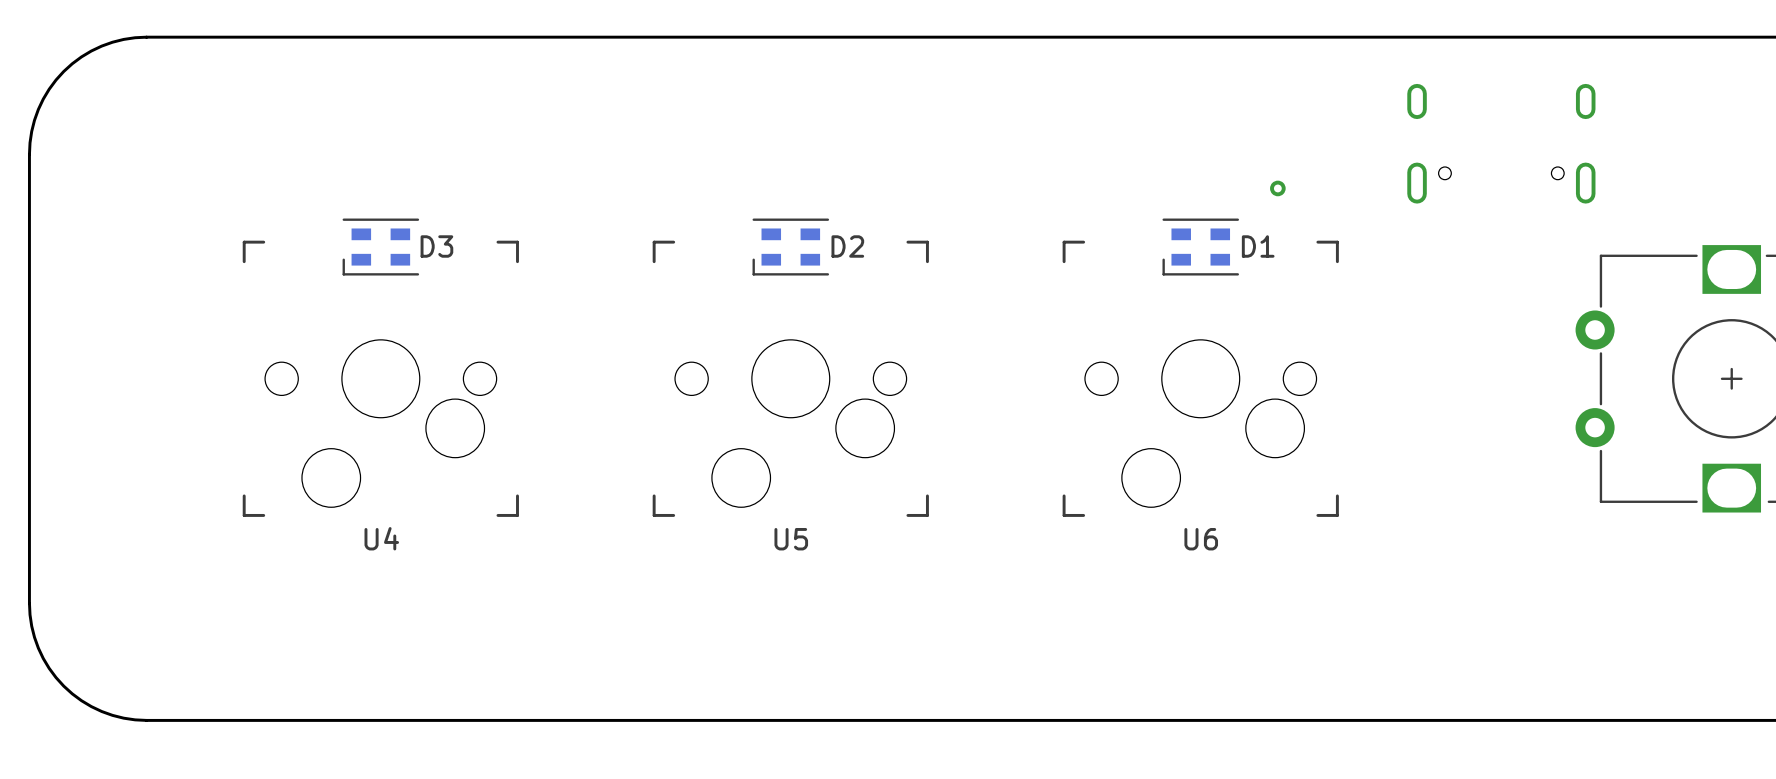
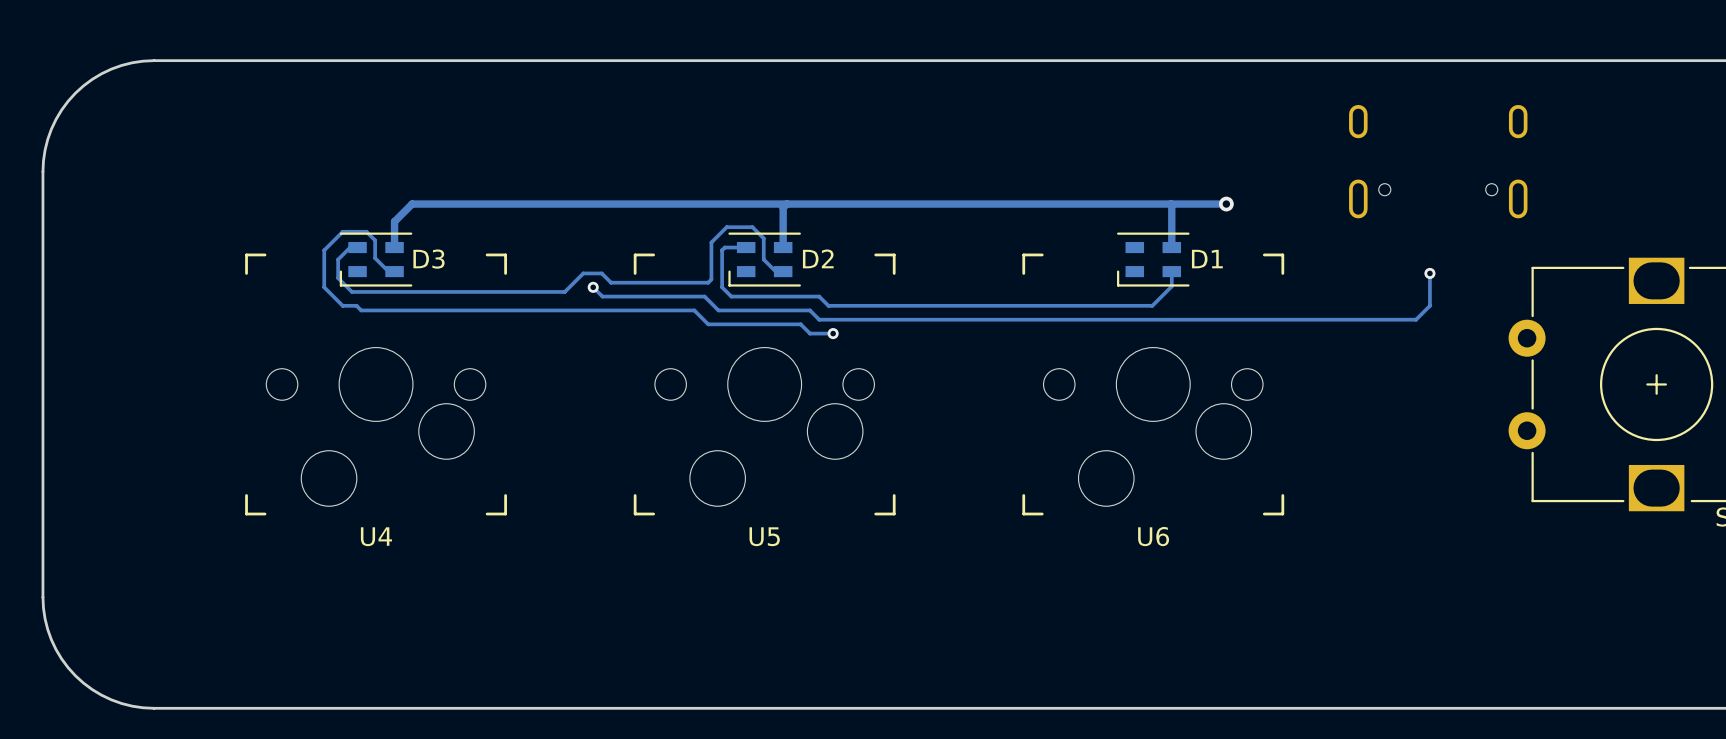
track: none -> (786, 204) (783, 207) (783, 247)
track: none -> (1170, 204) (1171, 247)
track: none -> (1226, 204) (412, 204) (394, 221) (394, 247)
track: none -> (357, 247) (350, 247) (338, 259) (338, 278) (352, 291) (564, 291) (583, 273) (601, 273) (611, 282) (708, 282) (711, 279) (711, 242) (726, 227) (752, 227) (763, 238) (763, 259) (775, 271) (783, 271)
track: none -> (746, 247) (724, 247) (722, 250) (722, 287) (731, 296) (819, 296) (828, 305) (1152, 305) (1171, 286) (1171, 271)
track: none -> (394, 271) (388, 271) (375, 258) (375, 240) (366, 231) (342, 231) (324, 250) (324, 287) (342, 305) (356, 305) (361, 310) (694, 310) (708, 324) (800, 324) (810, 333) (833, 333)
track: none -> (1429, 273) (1429, 305) (1416, 319) (819, 319) (810, 310) (718, 310) (704, 296) (602, 296) (593, 287)
via: none -> (1429, 273)
via: none -> (593, 287)
via: none -> (833, 333)

